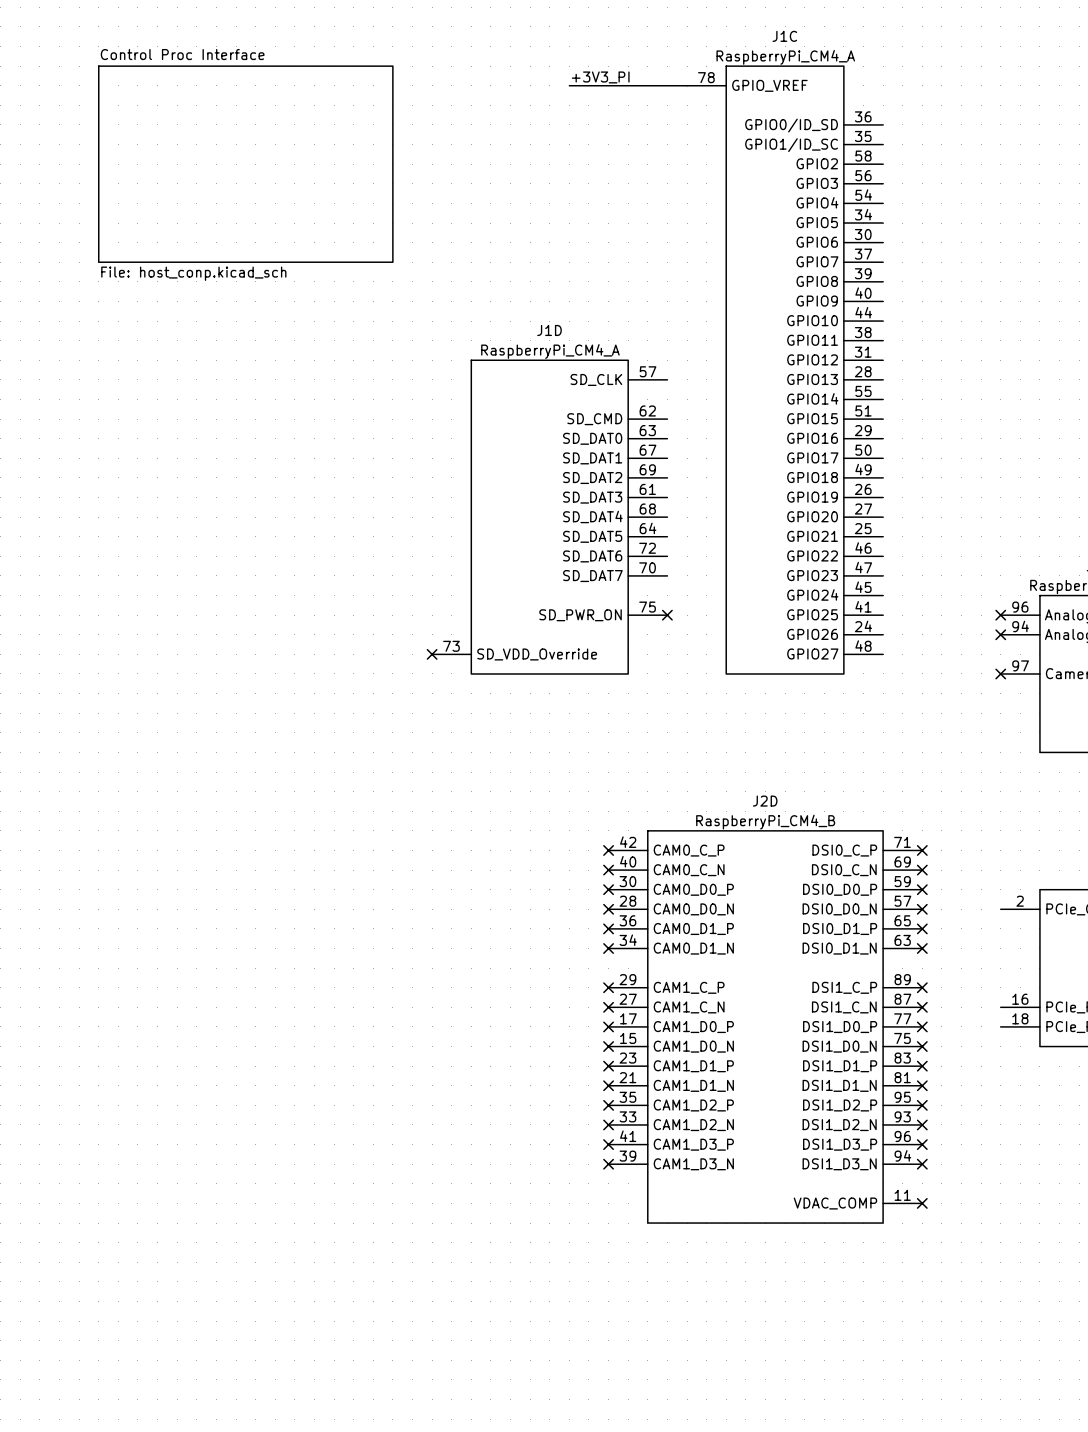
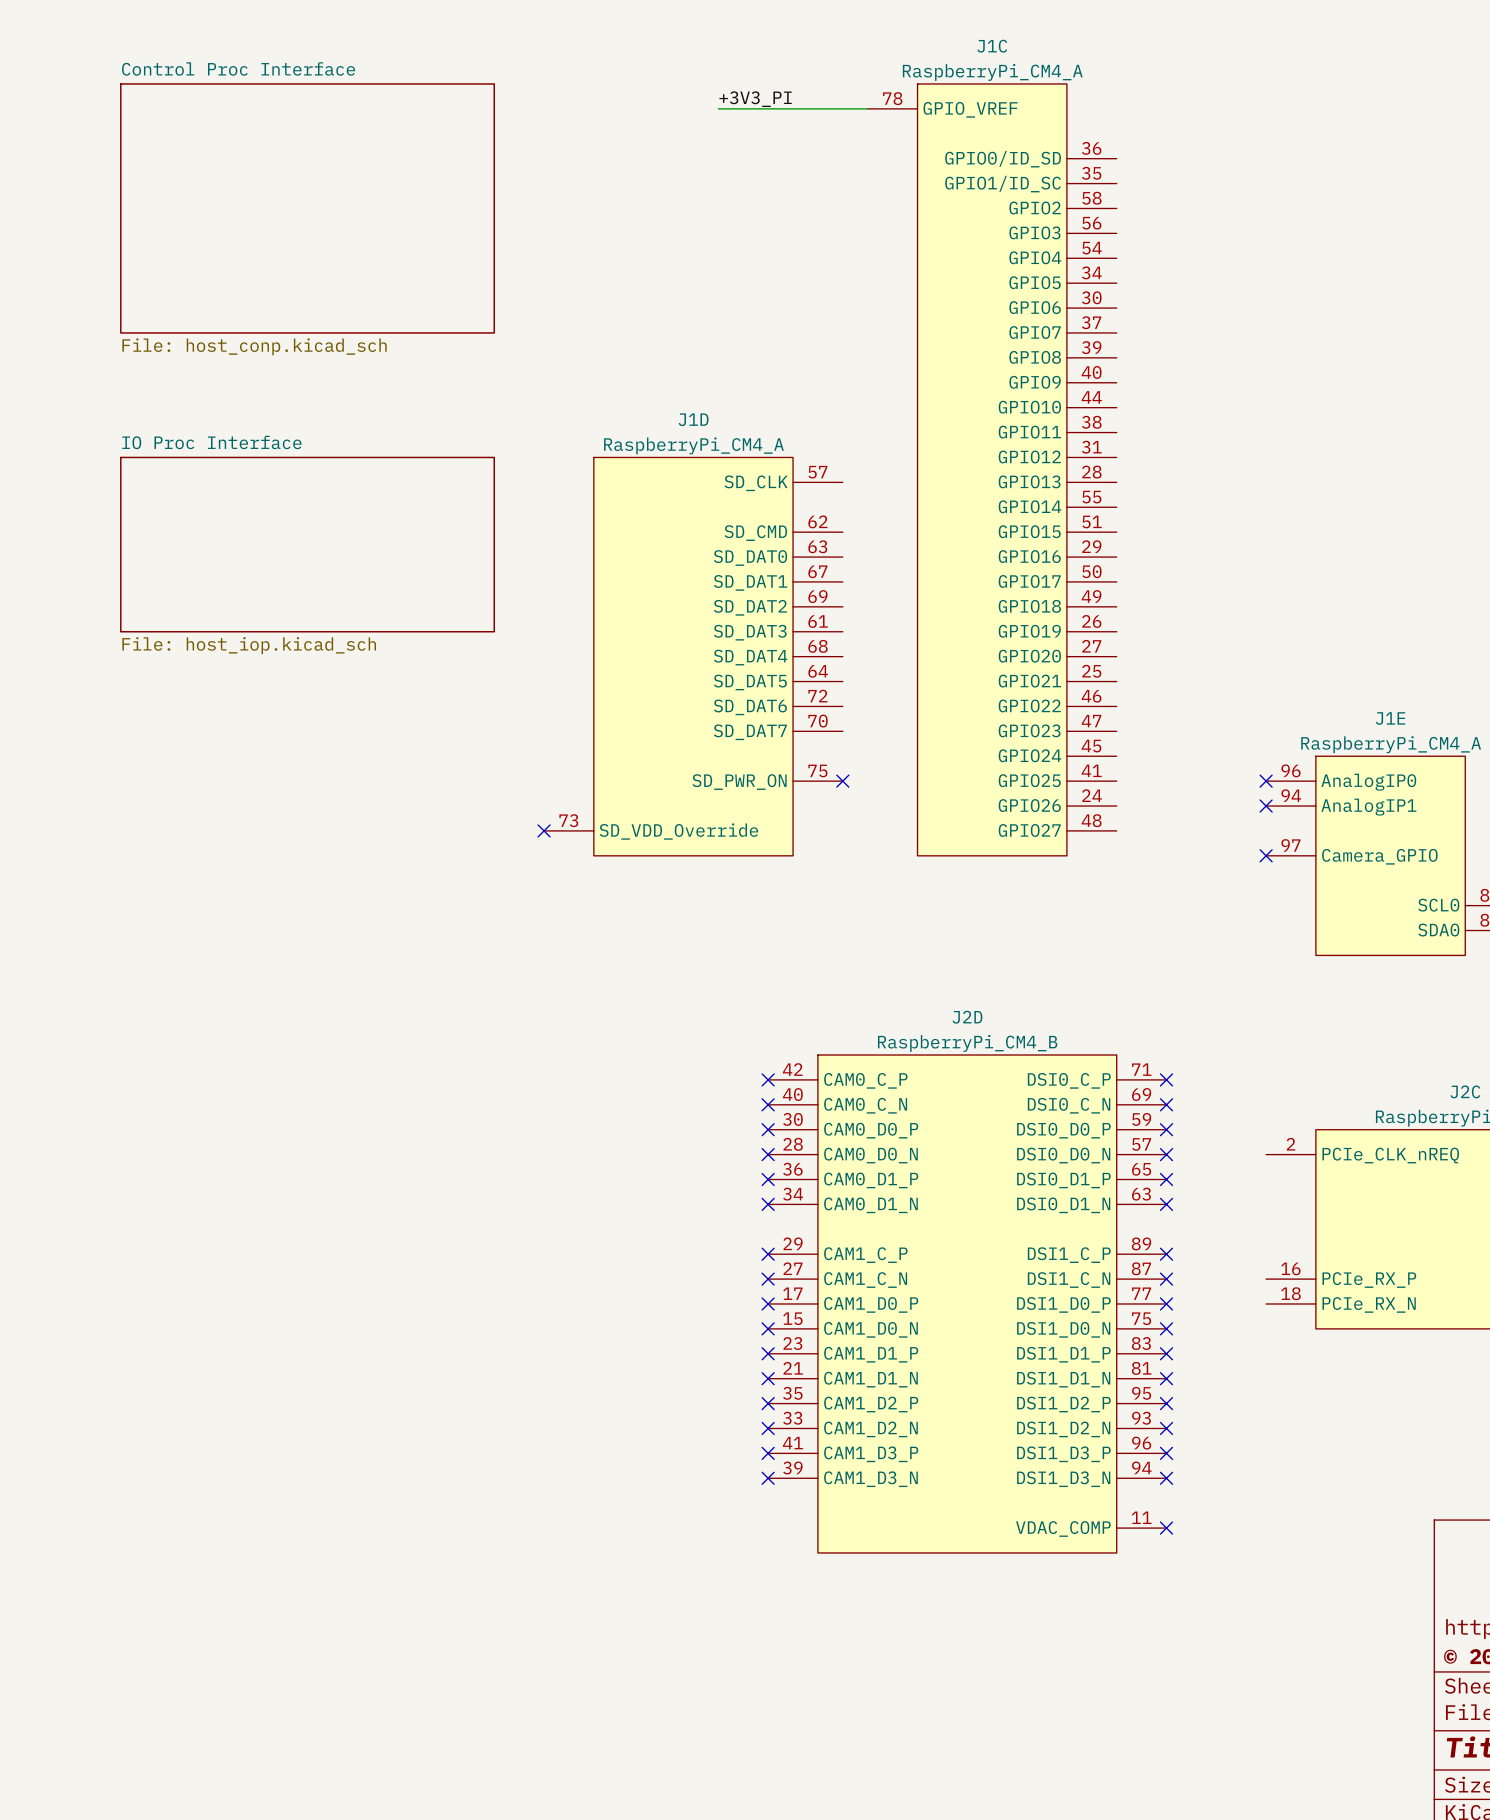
sheet IO Proc Interface: none -> File: host_iop.kicad_sch (307, 544)

